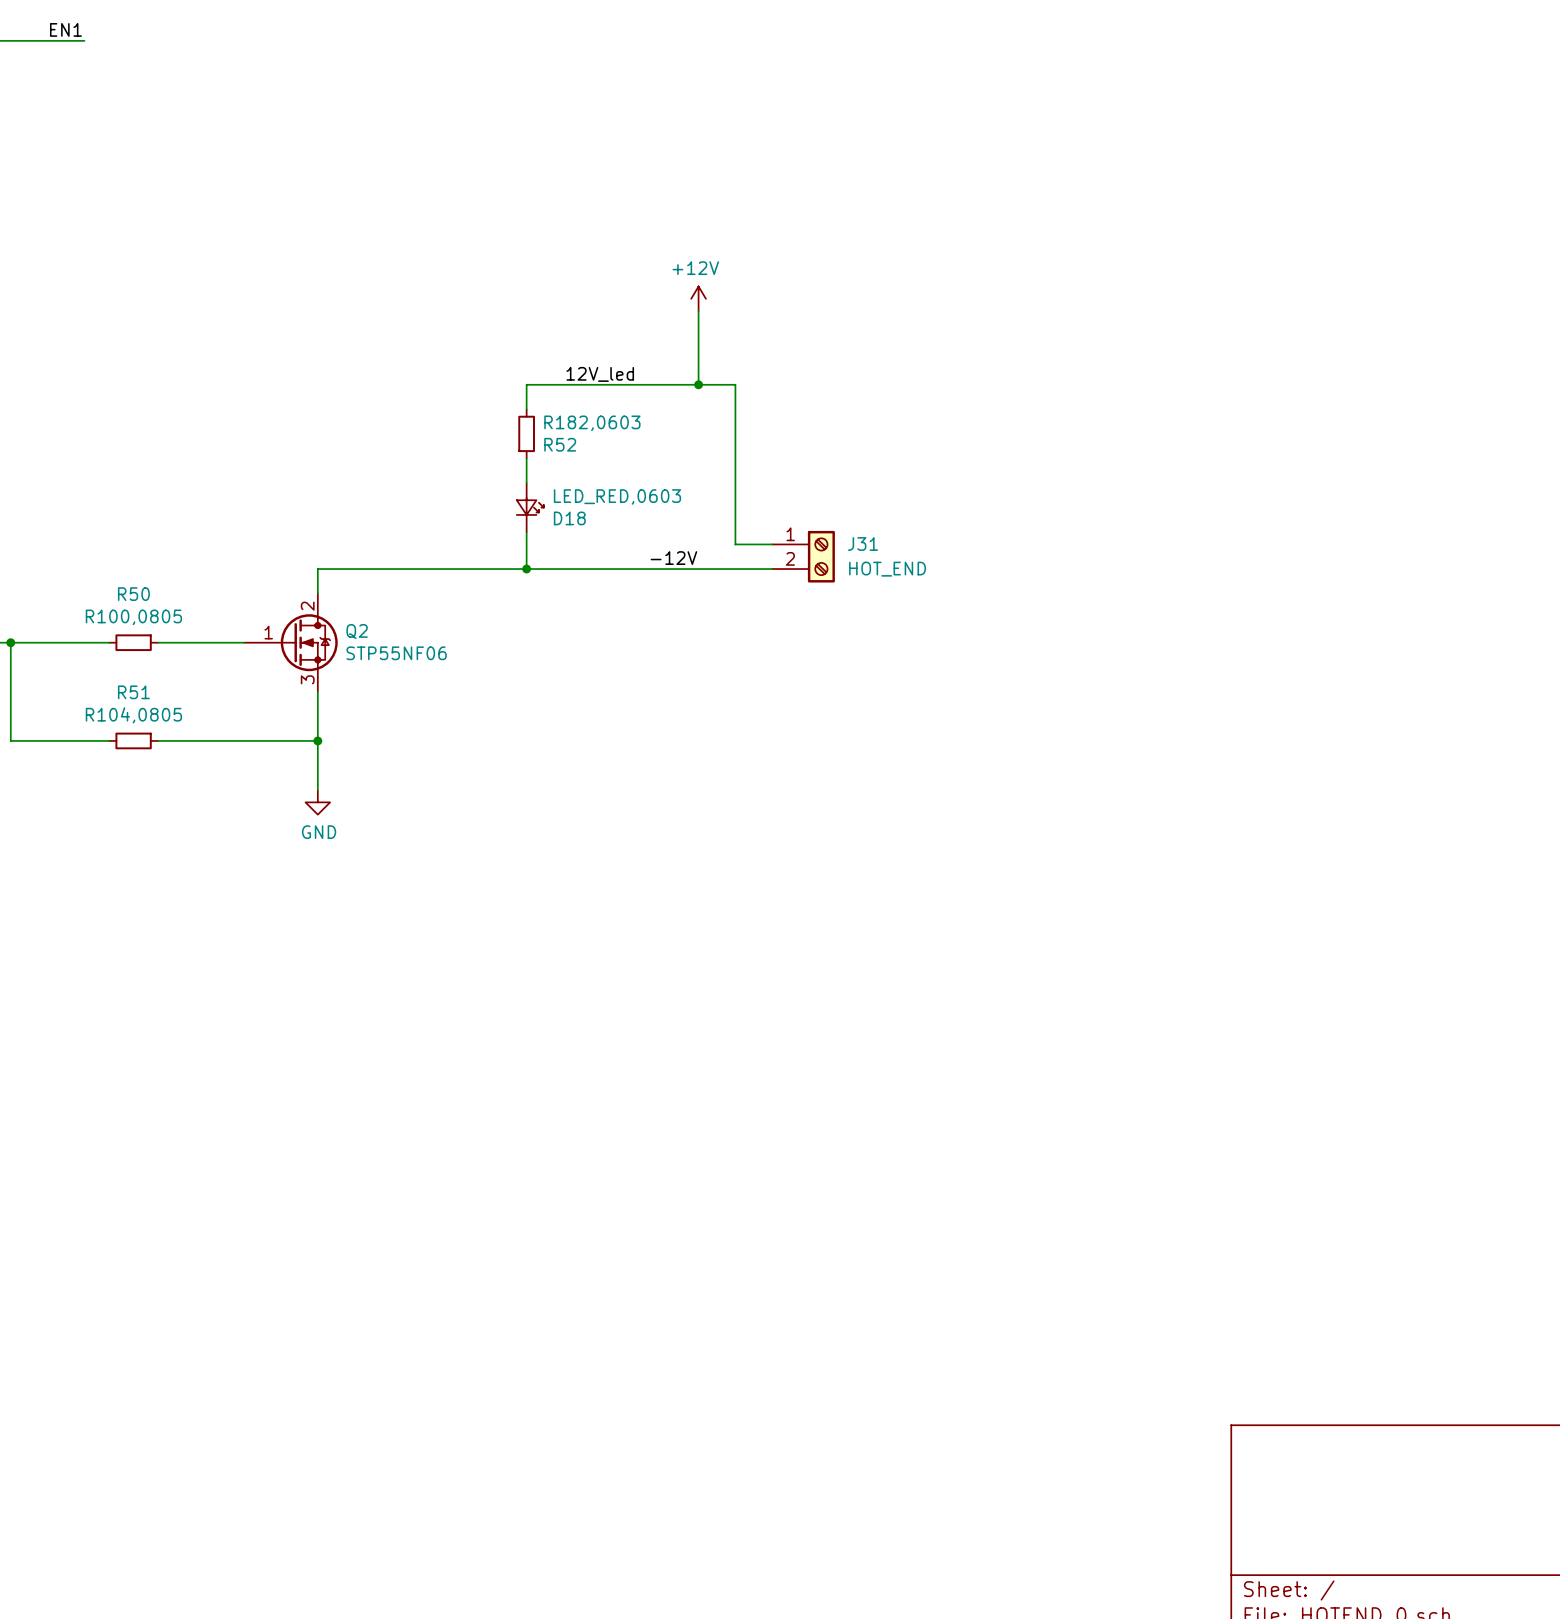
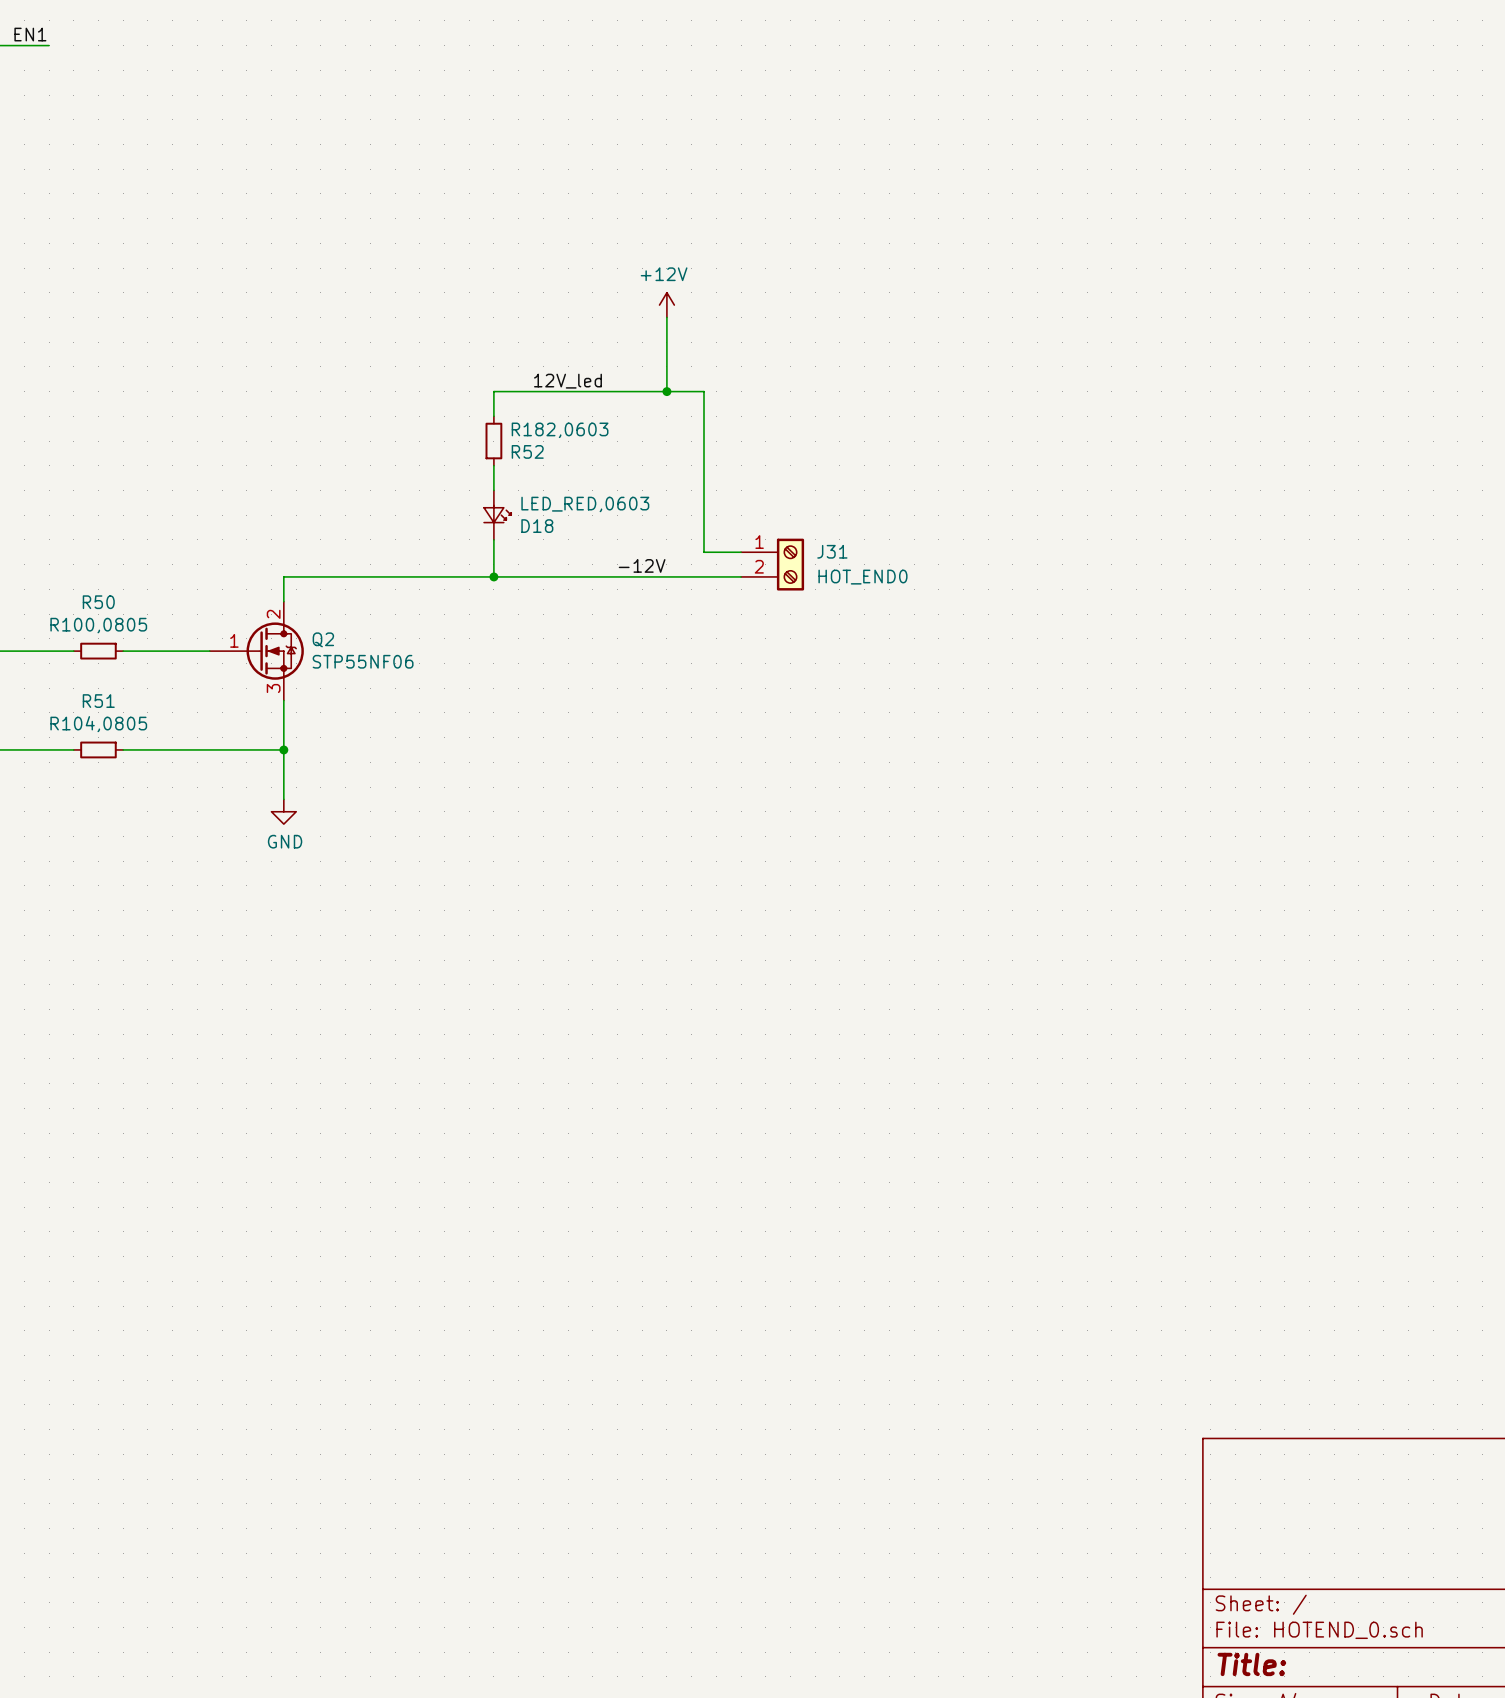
J31 value: HOT_END (887, 569) -> HOT_END0 (862, 577)

